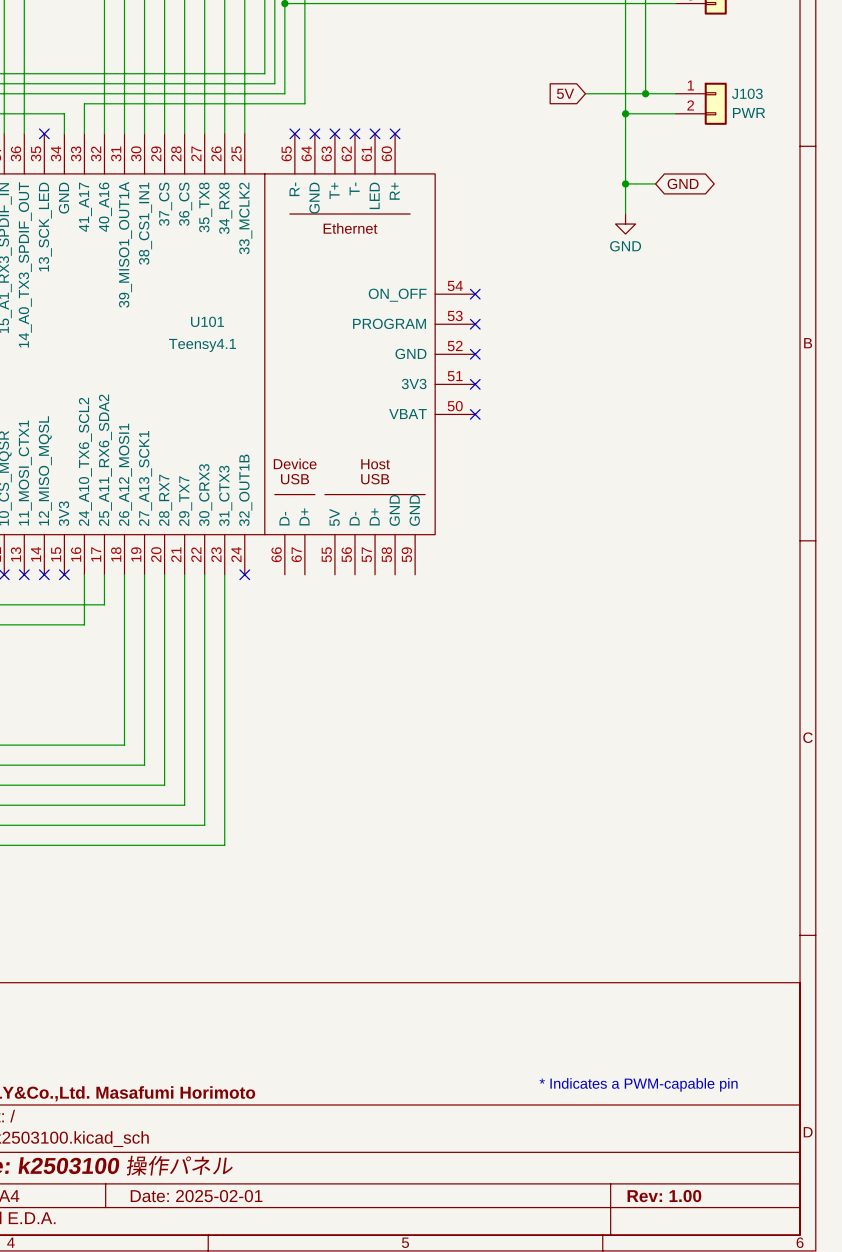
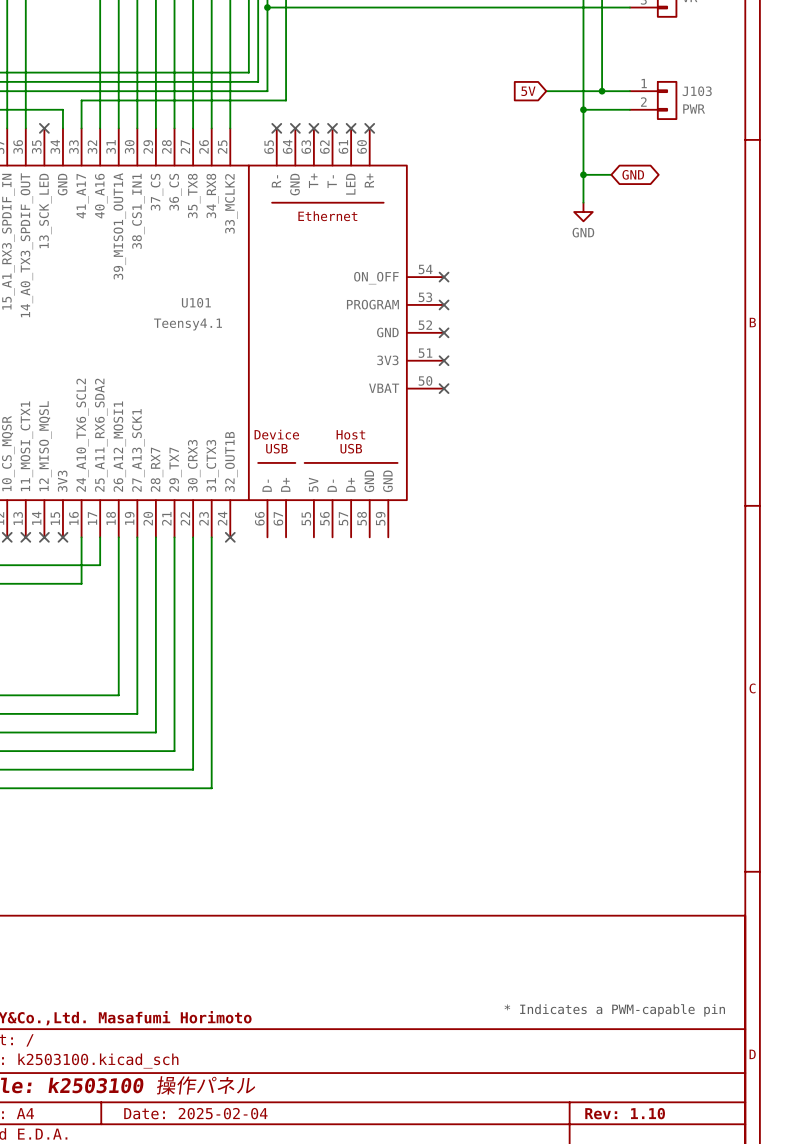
title block: Date: 2025-02-01 (196, 1196) -> Date: 2025-02-04 (195, 1113)
title block: Rev: 1.00 (664, 1196) -> Rev: 1.10 (625, 1113)

